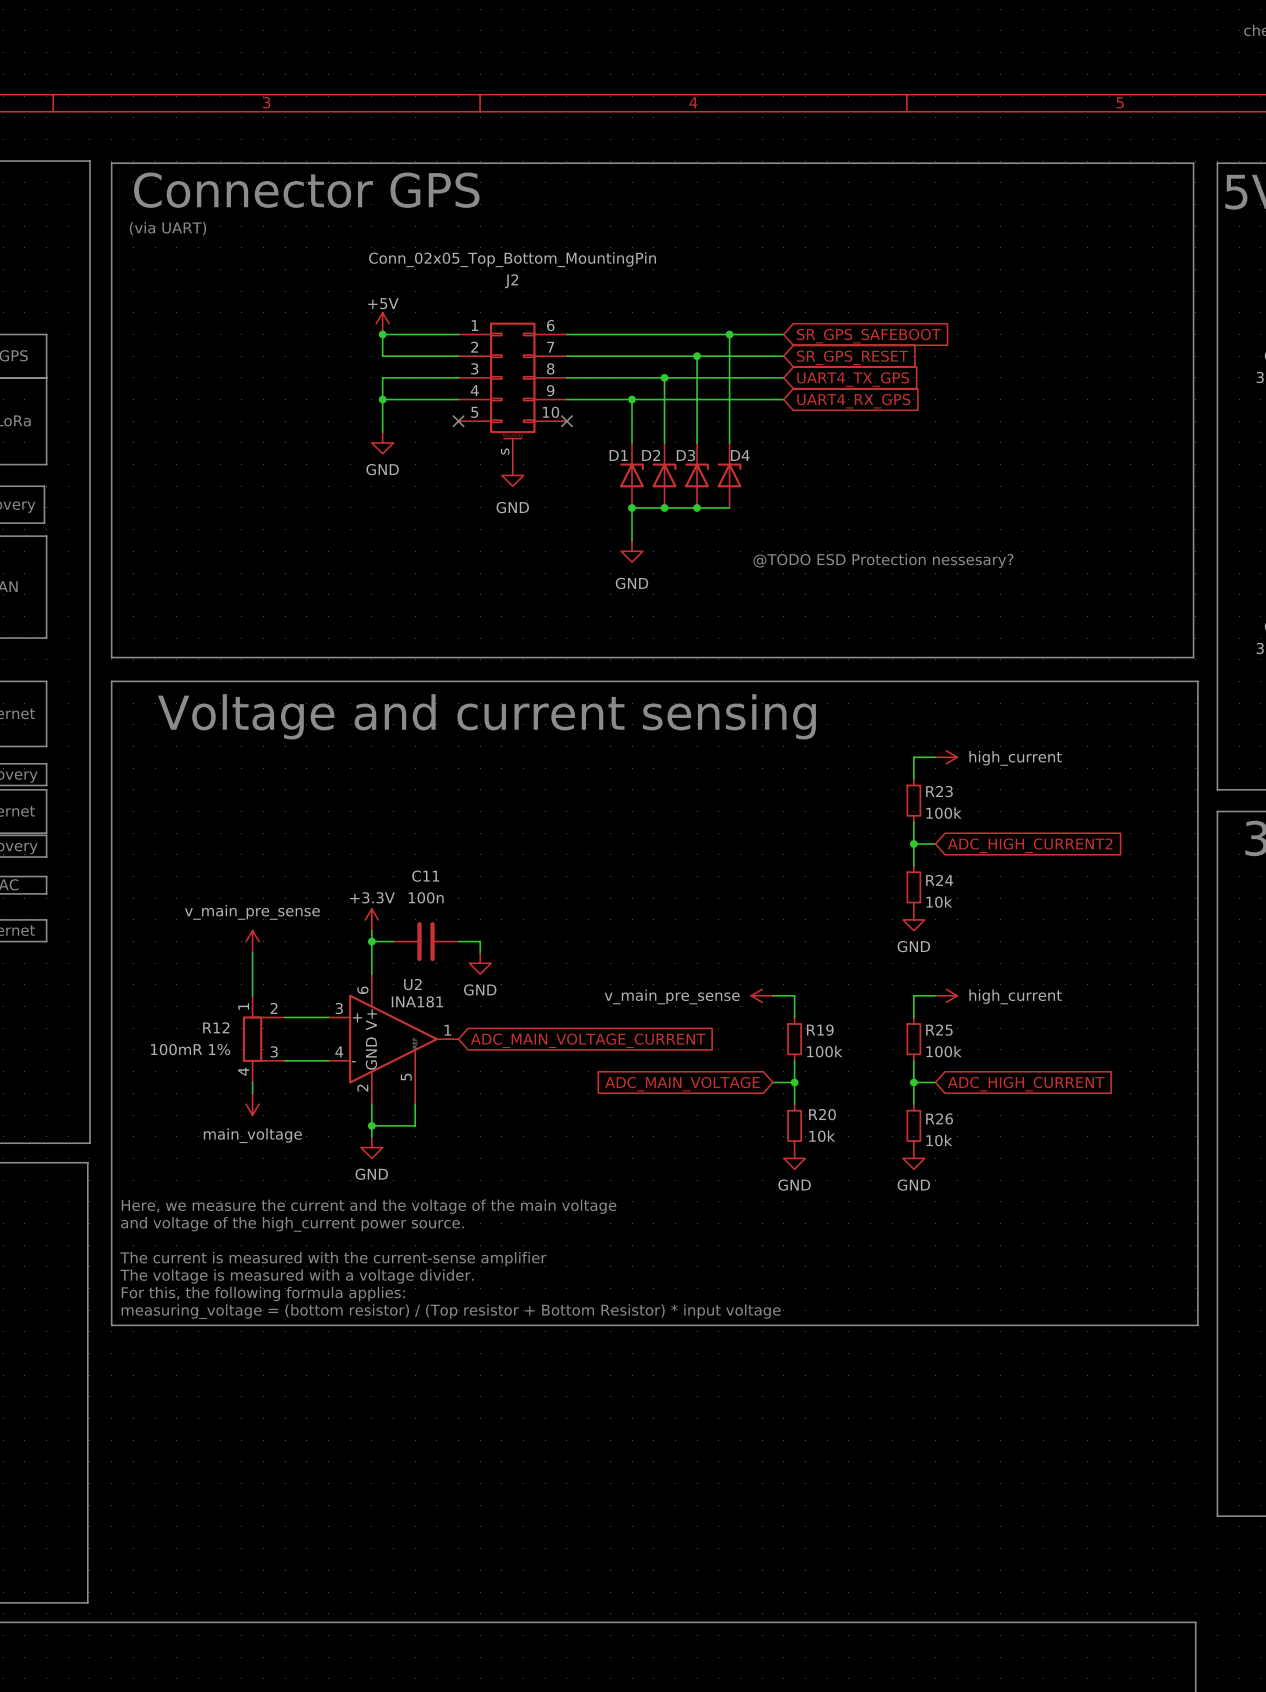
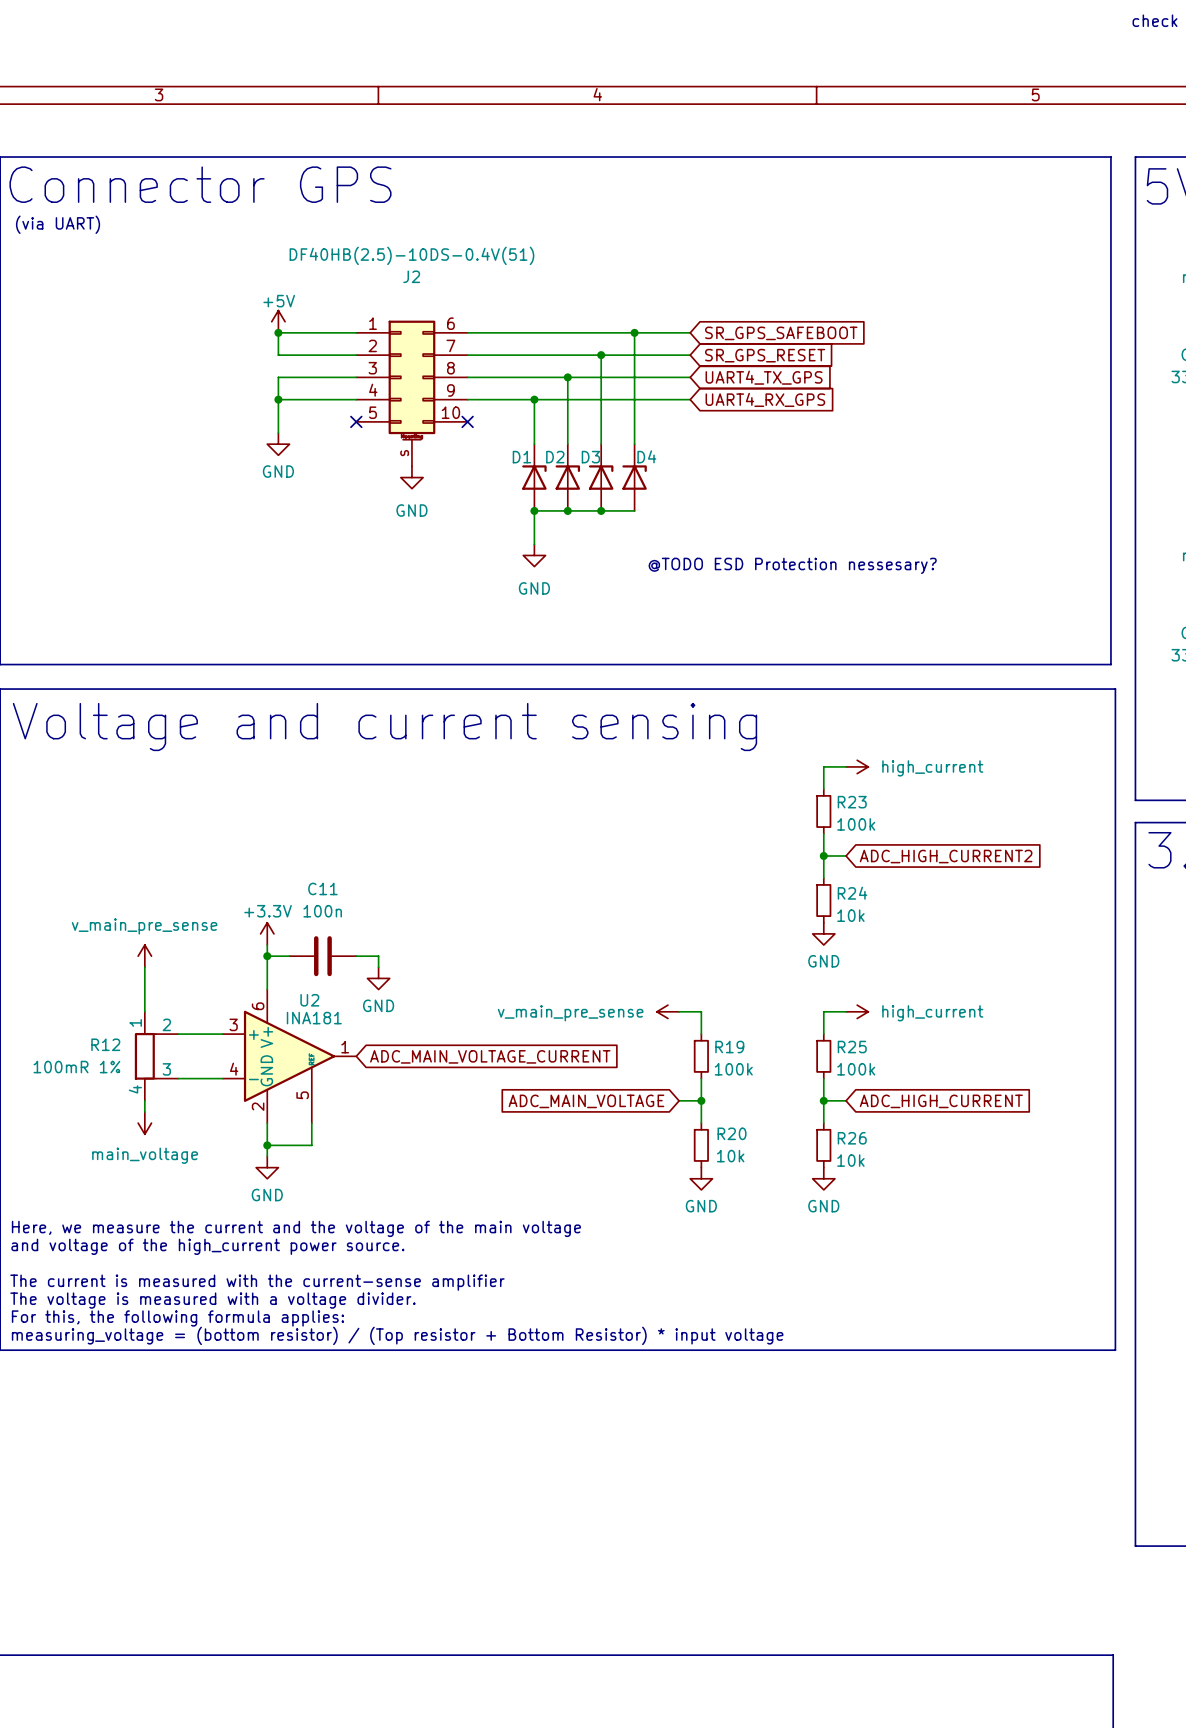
J2 value: Conn_02x05_Top_Bottom_MountingPin (512, 259) -> DF40HB(2.5)-10DS-0.4V(51) (411, 255)

